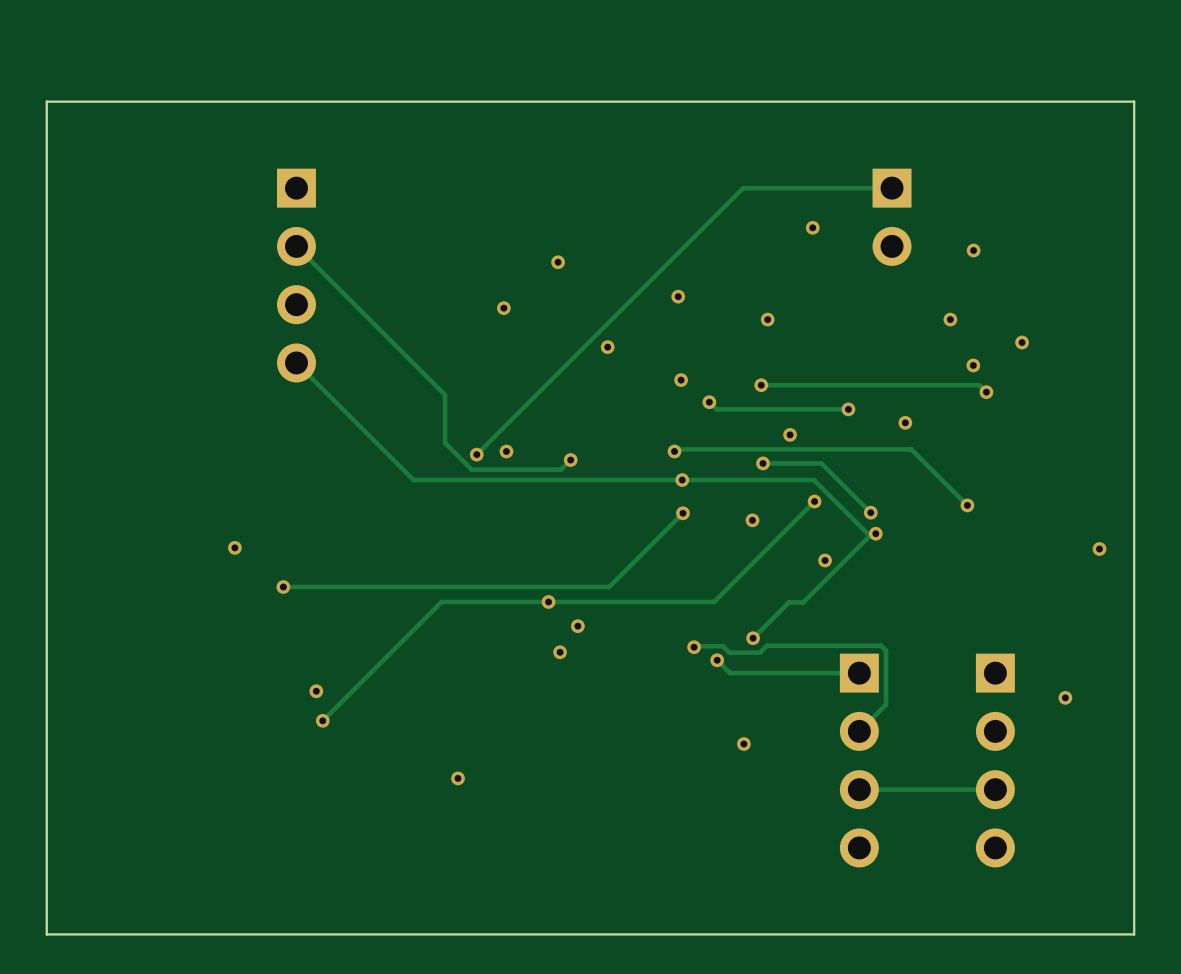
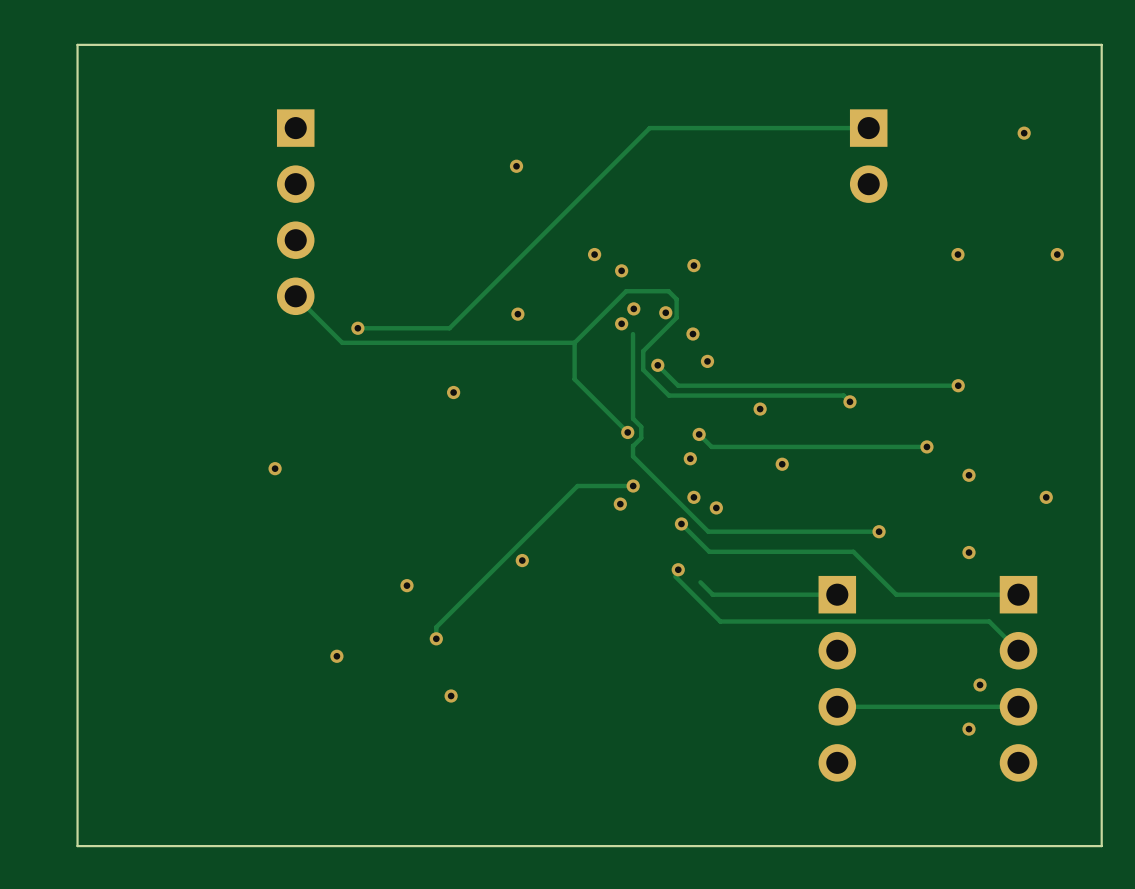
board edge: (69, 101) (46, 101) (46, 934) (69, 934) -> (77, 44) (77, 846)
track: (743, 188) (476, 454) -> (725, 128) (649, 128) (449, 328) (357, 328)
via: none -> (1024, 133)
via: none -> (516, 166)
via: (812, 227) -> none
track: (296, 246) (445, 395) (445, 443) (471, 469) (561, 469) (570, 460) -> none
via: (973, 250) -> none
via: (558, 262) -> none
via: (678, 296) -> none
via: (503, 308) -> none
via: none -> (594, 254)
via: (767, 319) -> none
via: (950, 319) -> none
via: none -> (957, 254)
via: none -> (1057, 254)
via: none -> (693, 265)
via: none -> (621, 270)
via: (1022, 342) -> none
via: (607, 347) -> none
via: (973, 365) -> none
via: none -> (633, 308)
via: none -> (517, 314)
track: (761, 385) (979, 385) (986, 392) -> none
via: (761, 385) -> none
via: none -> (621, 323)
via: (986, 392) -> none
via: none -> (357, 328)
track: none -> (633, 334) (633, 418)
track: (709, 402) (716, 409) (848, 409) -> none
via: (848, 409) -> none
track: (344, 411) (413, 480) (813, 480) (869, 535) -> (342, 342) (574, 342)
track: none -> (574, 342) (574, 379) (627, 432)
track: none -> (574, 342) (626, 291) (668, 291) (676, 299) (676, 317) (643, 351) (643, 369) (668, 395) (843, 395) (849, 401)
via: (905, 422) -> none
via: none -> (707, 361)
track: none -> (657, 365) (678, 385) (958, 385)
via: (790, 434) -> none
via: (506, 451) -> none
track: (674, 451) (676, 449) (911, 449) (967, 505) -> none
via position: (674, 451) -> (657, 365)
via position: (476, 454) -> (453, 392)
via: none -> (958, 385)
via: (570, 460) -> none
track: (763, 463) (821, 463) (870, 512) -> none
via: (763, 463) -> none
via: none -> (849, 401)
via: (682, 480) -> none
via: none -> (760, 409)
track: none -> (633, 418) (641, 426) (641, 438) (633, 445)
track: (814, 501) (714, 601) (441, 601) (322, 720) -> none
via: (814, 501) -> none
via: none -> (627, 432)
via position: (967, 505) -> (926, 446)
track: none -> (699, 434) (711, 446) (926, 446)
via: none -> (699, 434)
via: (870, 512) -> none
track: (682, 513) (609, 587) (283, 587) -> none
via: (682, 513) -> none
track: none -> (633, 445) (633, 456) (708, 531) (879, 531)
via: (752, 520) -> none
via: none -> (690, 458)
via: (875, 533) -> none
track: (869, 535) (803, 602) (788, 602) (753, 638) -> none
via: none -> (782, 464)
via: none -> (275, 468)
via: (234, 547) -> none
via: none -> (969, 475)
via position: (1099, 549) -> (1046, 497)
track: none -> (633, 486) (577, 486) (436, 627) (436, 638)
via: none -> (633, 486)
via: (825, 560) -> none
via: none -> (693, 497)
via: none -> (620, 504)
via: none -> (716, 507)
via: (283, 587) -> none
track: none -> (681, 523) (709, 551) (853, 551) (896, 594) (1018, 594)
via: none -> (681, 523)
via: (548, 601) -> none
via: none -> (879, 531)
via: (577, 626) -> none
via: none -> (969, 552)
via: none -> (522, 560)
via: (753, 638) -> none
track: (694, 647) (722, 646) (729, 652) (759, 652) (766, 645) (881, 645) (886, 650) (886, 704) (859, 731) -> none
via: (560, 652) -> none
track: none -> (675, 576) (720, 621) (989, 621) (1018, 650)
via: (717, 660) -> none
via: none -> (406, 585)
via: (316, 691) -> none
via: (1065, 697) -> none
via: none -> (436, 638)
via position: (322, 720) -> (336, 656)
via: (743, 744) -> none
part position: (995, 760) -> (1018, 678)
via: none -> (980, 684)
track: none -> (1018, 706) (968, 706)
via: none -> (969, 729)

